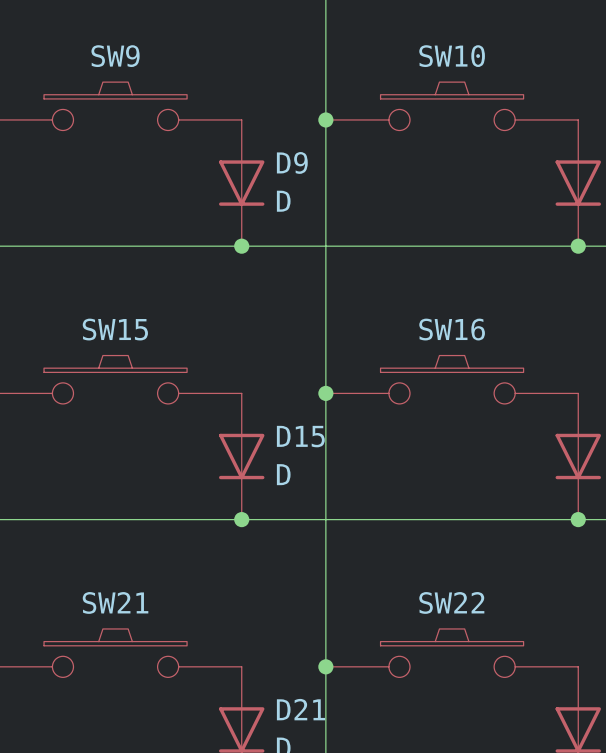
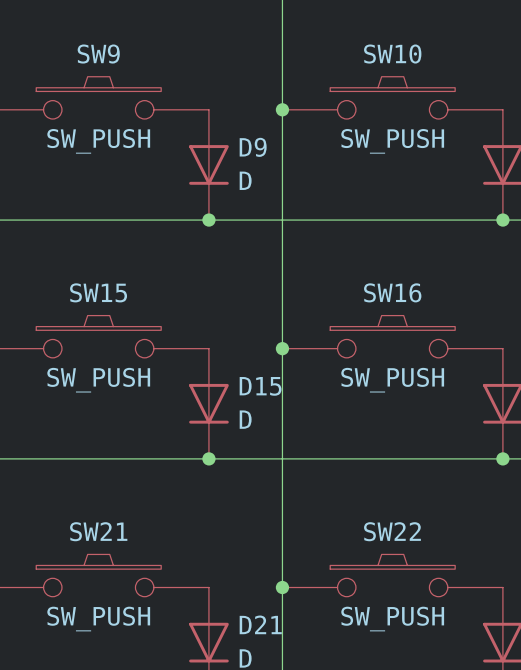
SW9 value: none -> SW_PUSH (98, 141)
SW10 value: none -> SW_PUSH (392, 141)
SW15 value: none -> SW_PUSH (98, 380)
SW16 value: none -> SW_PUSH (392, 380)
SW21 value: none -> SW_PUSH (98, 619)
SW22 value: none -> SW_PUSH (392, 619)

